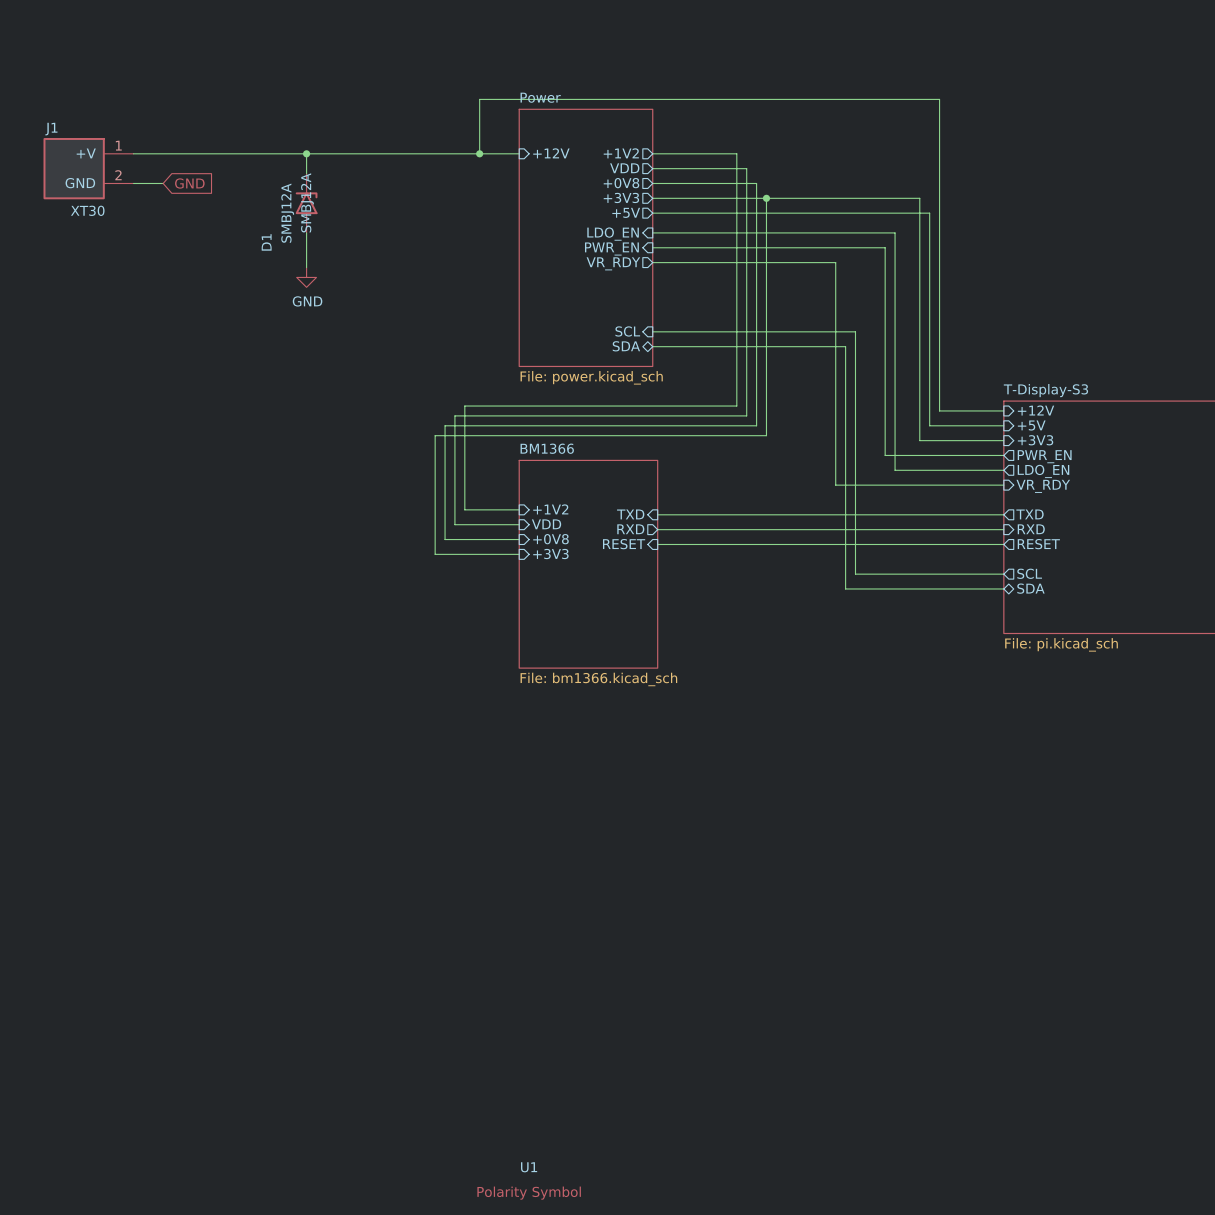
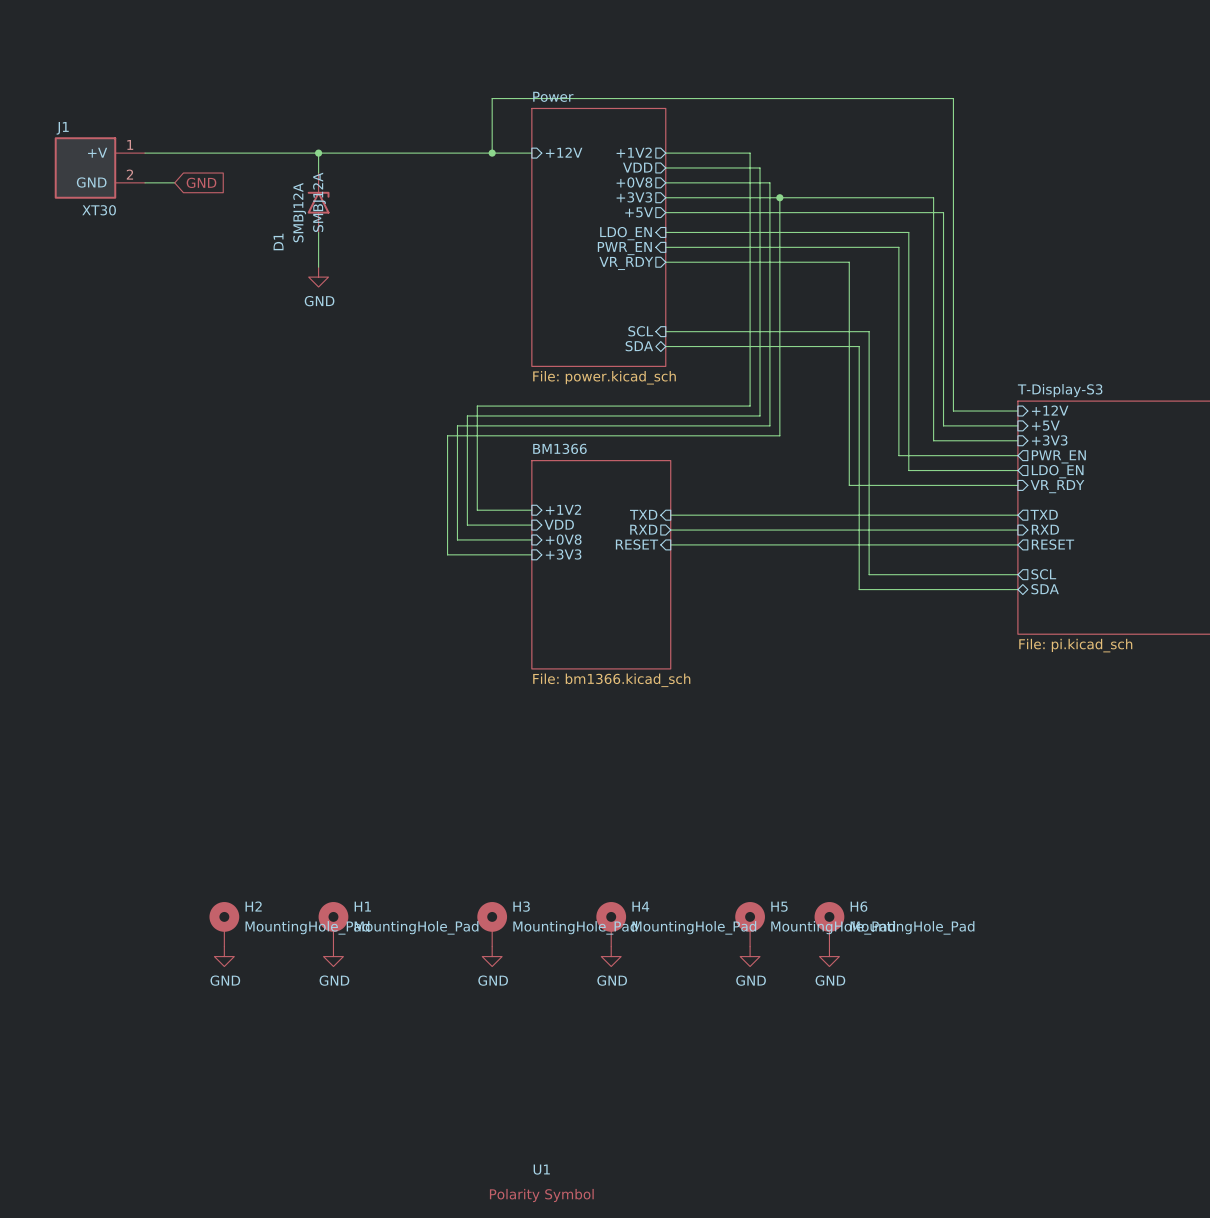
H2: none -> MountingHole_Pad (224, 924)
H1: none -> MountingHole_Pad (333, 924)
H3: none -> MountingHole_Pad (492, 924)
H4: none -> MountingHole_Pad (611, 924)
H5: none -> MountingHole_Pad (750, 924)
H6: none -> MountingHole_Pad (829, 924)
power symbol: none -> GND (224, 956)
power symbol: none -> GND (333, 956)
power symbol: none -> GND (492, 956)
power symbol: none -> GND (611, 956)
power symbol: none -> GND (750, 956)
power symbol: none -> GND (829, 956)

